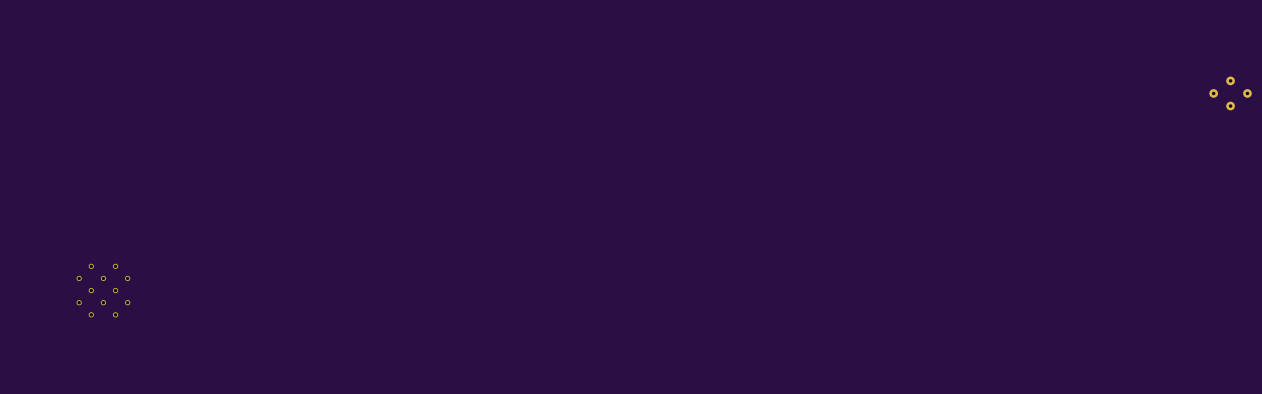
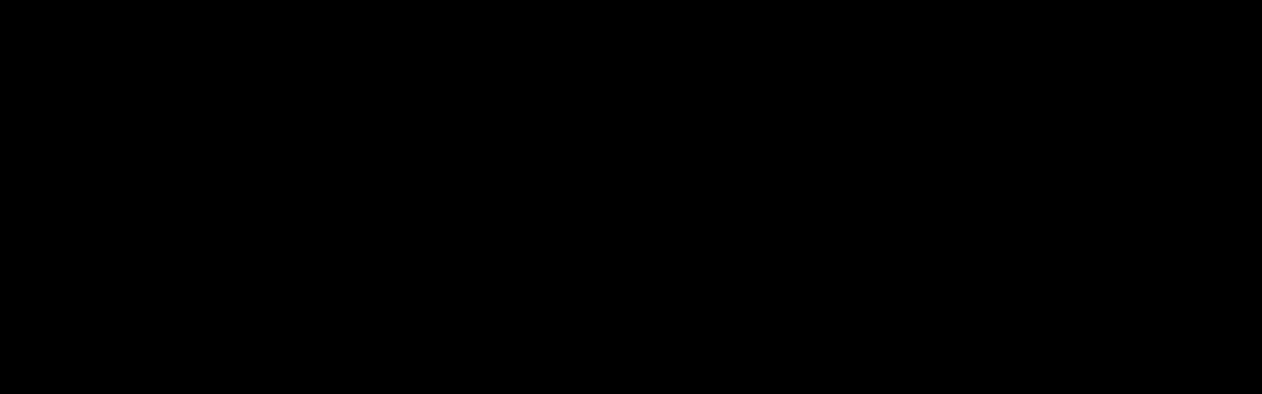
part: (1230, 93) -> none
part: (103, 290) -> none

